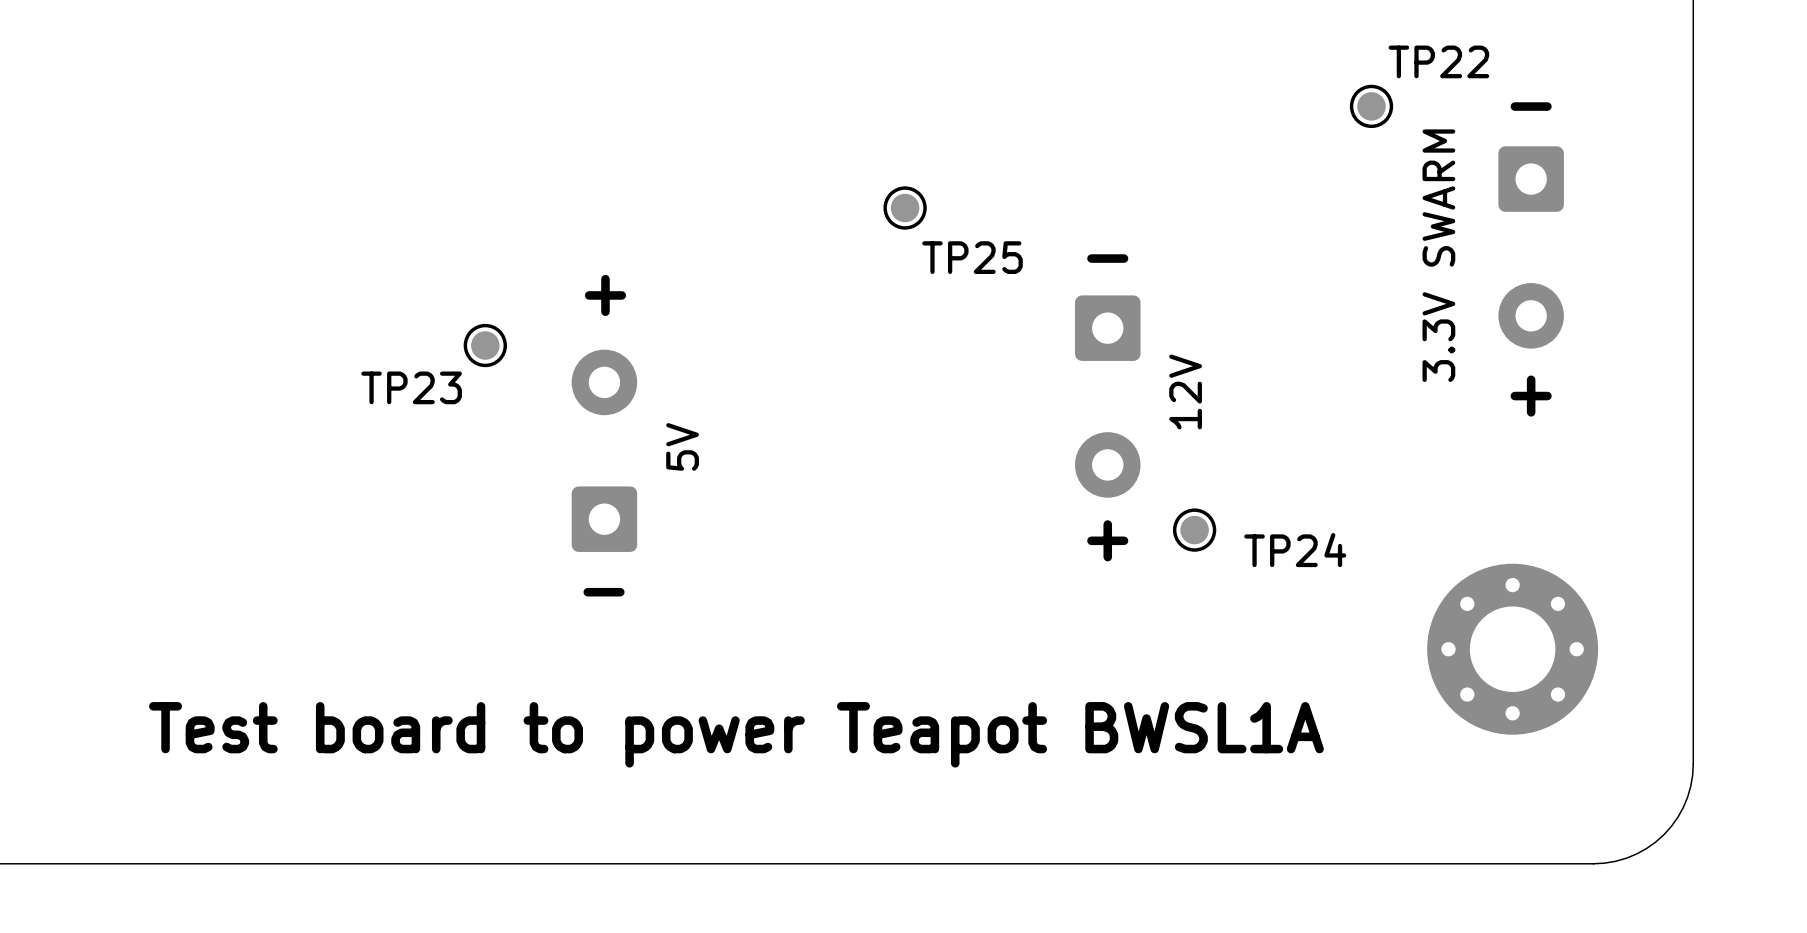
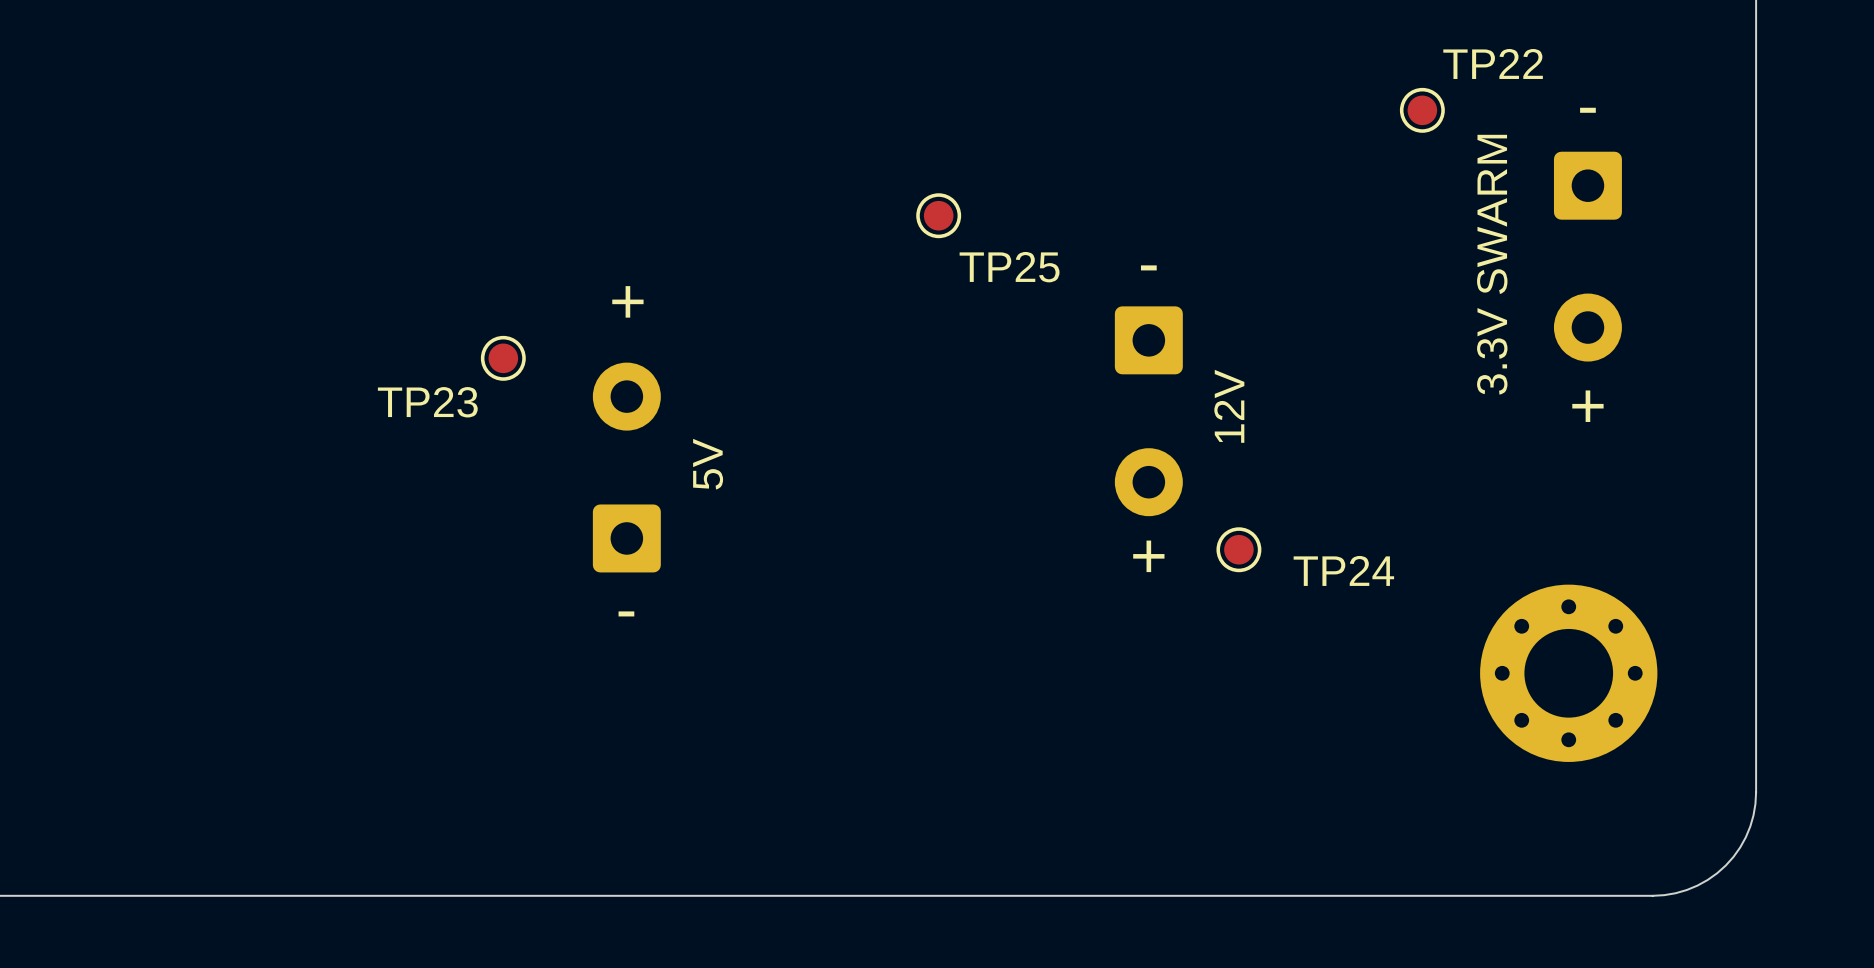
text: Test board to power Teapot BWSL1A (736, 734) -> none

